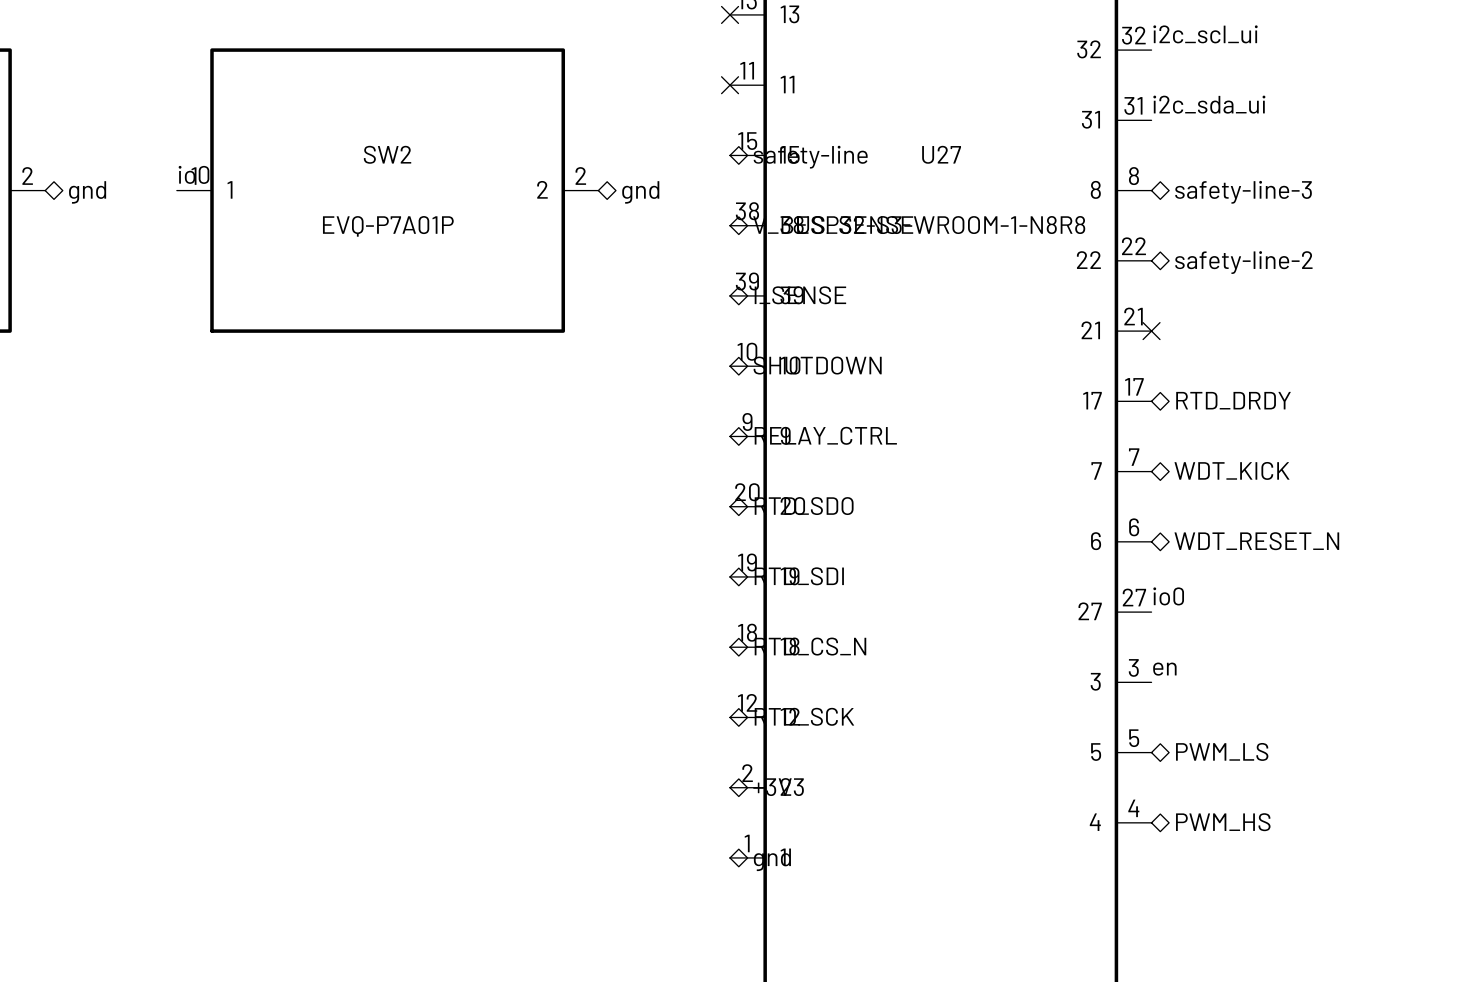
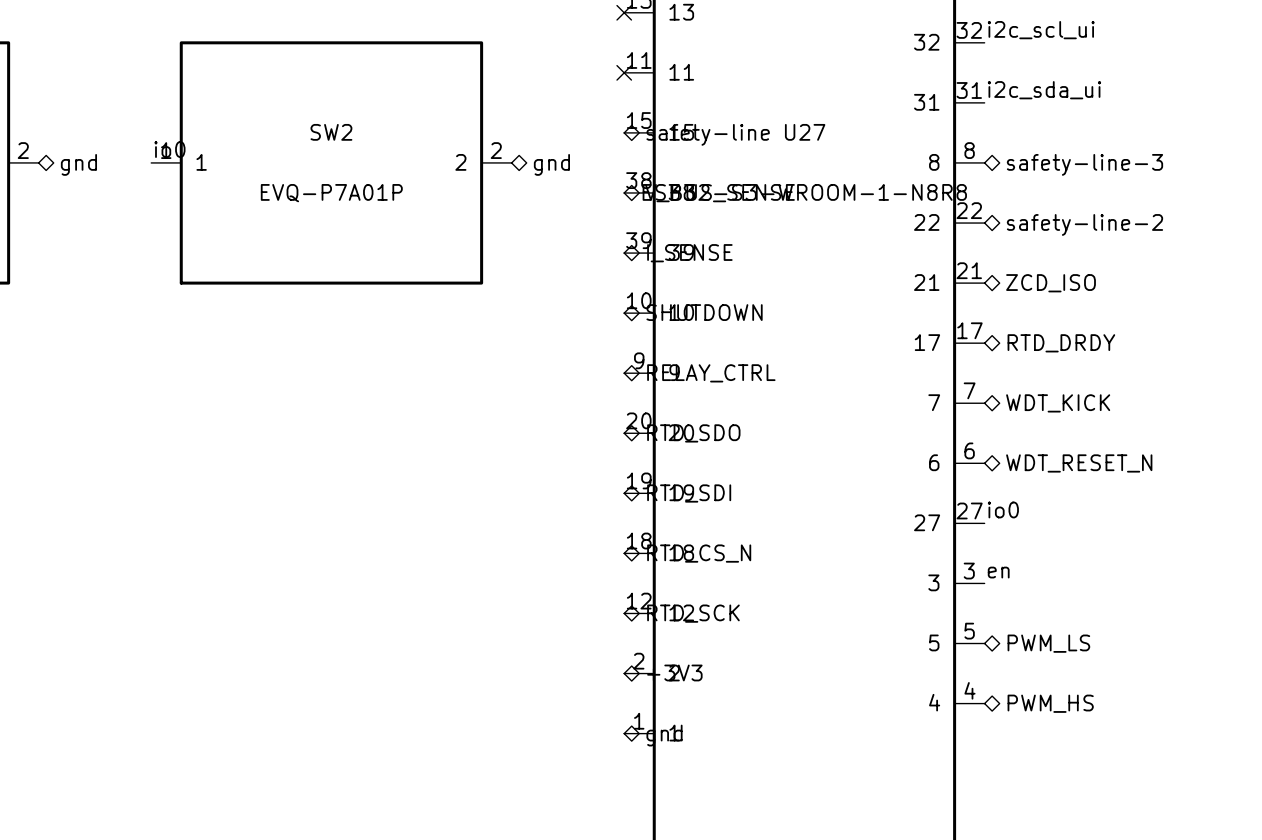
hierarchical label: none -> ZCD_ISO (1051, 283)
no-connect mark: (1151, 331) -> none

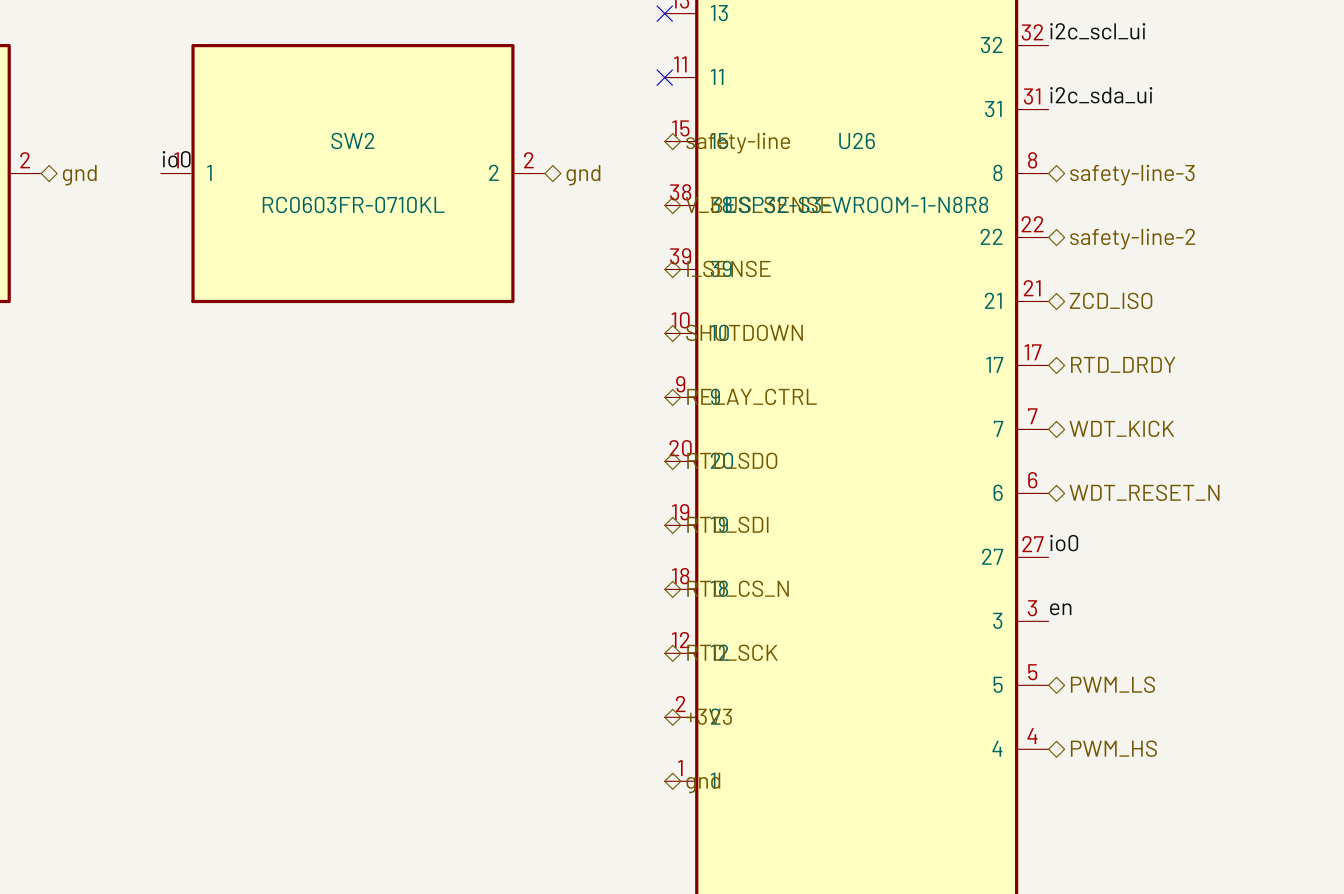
U27 name: U27 (805, 132) -> U26 (857, 140)
SW2 value: EVQ-P7A01P (331, 193) -> RC0603FR-0710KL (353, 204)

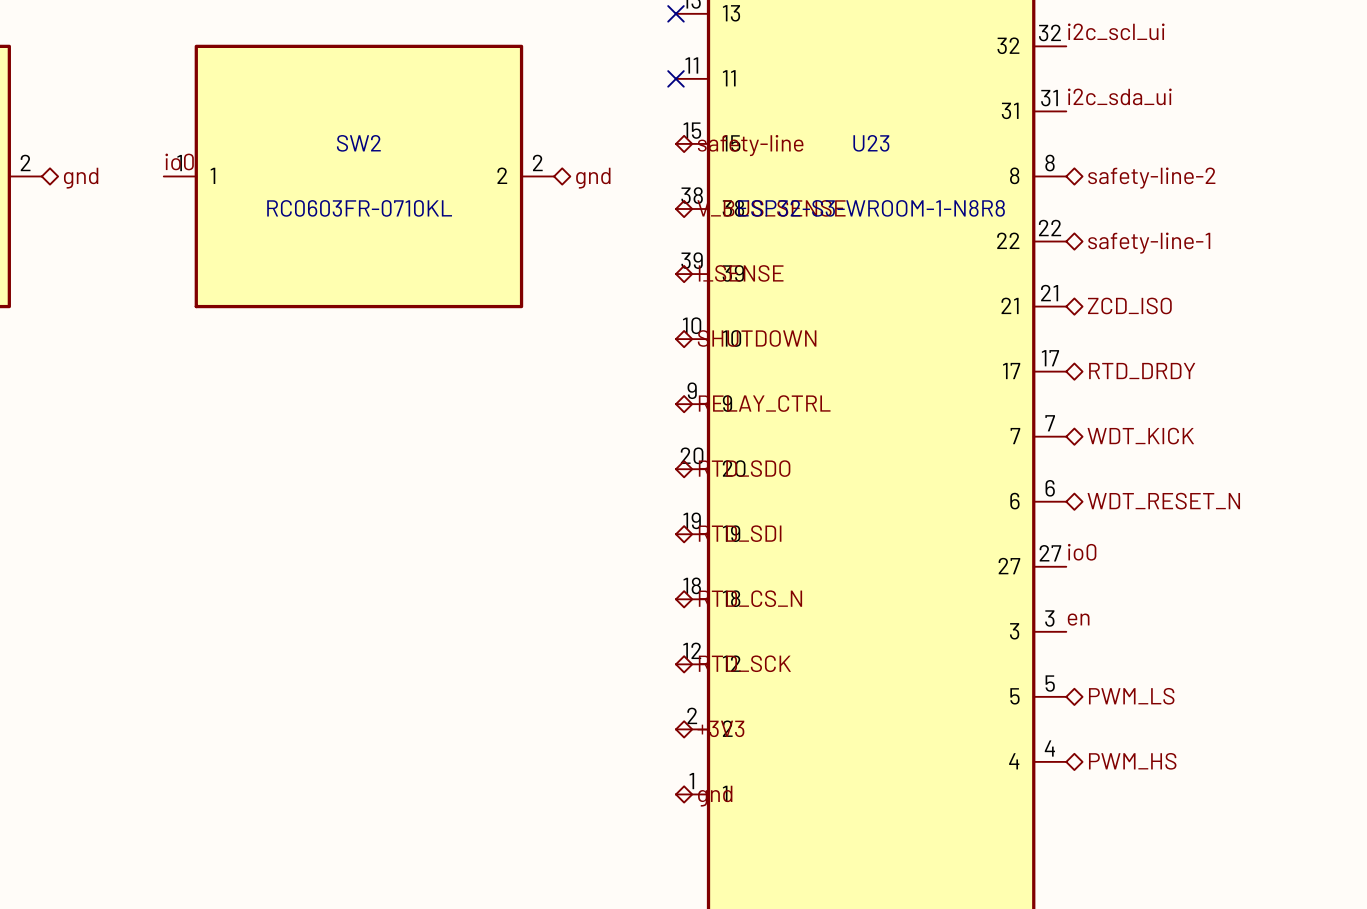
U26 name: U26 (857, 140) -> U23 (871, 143)
hierarchical label: safety-line-3 (1132, 175) -> safety-line-2 (1151, 178)
hierarchical label: safety-line-2 (1132, 239) -> safety-line-1 (1149, 243)

